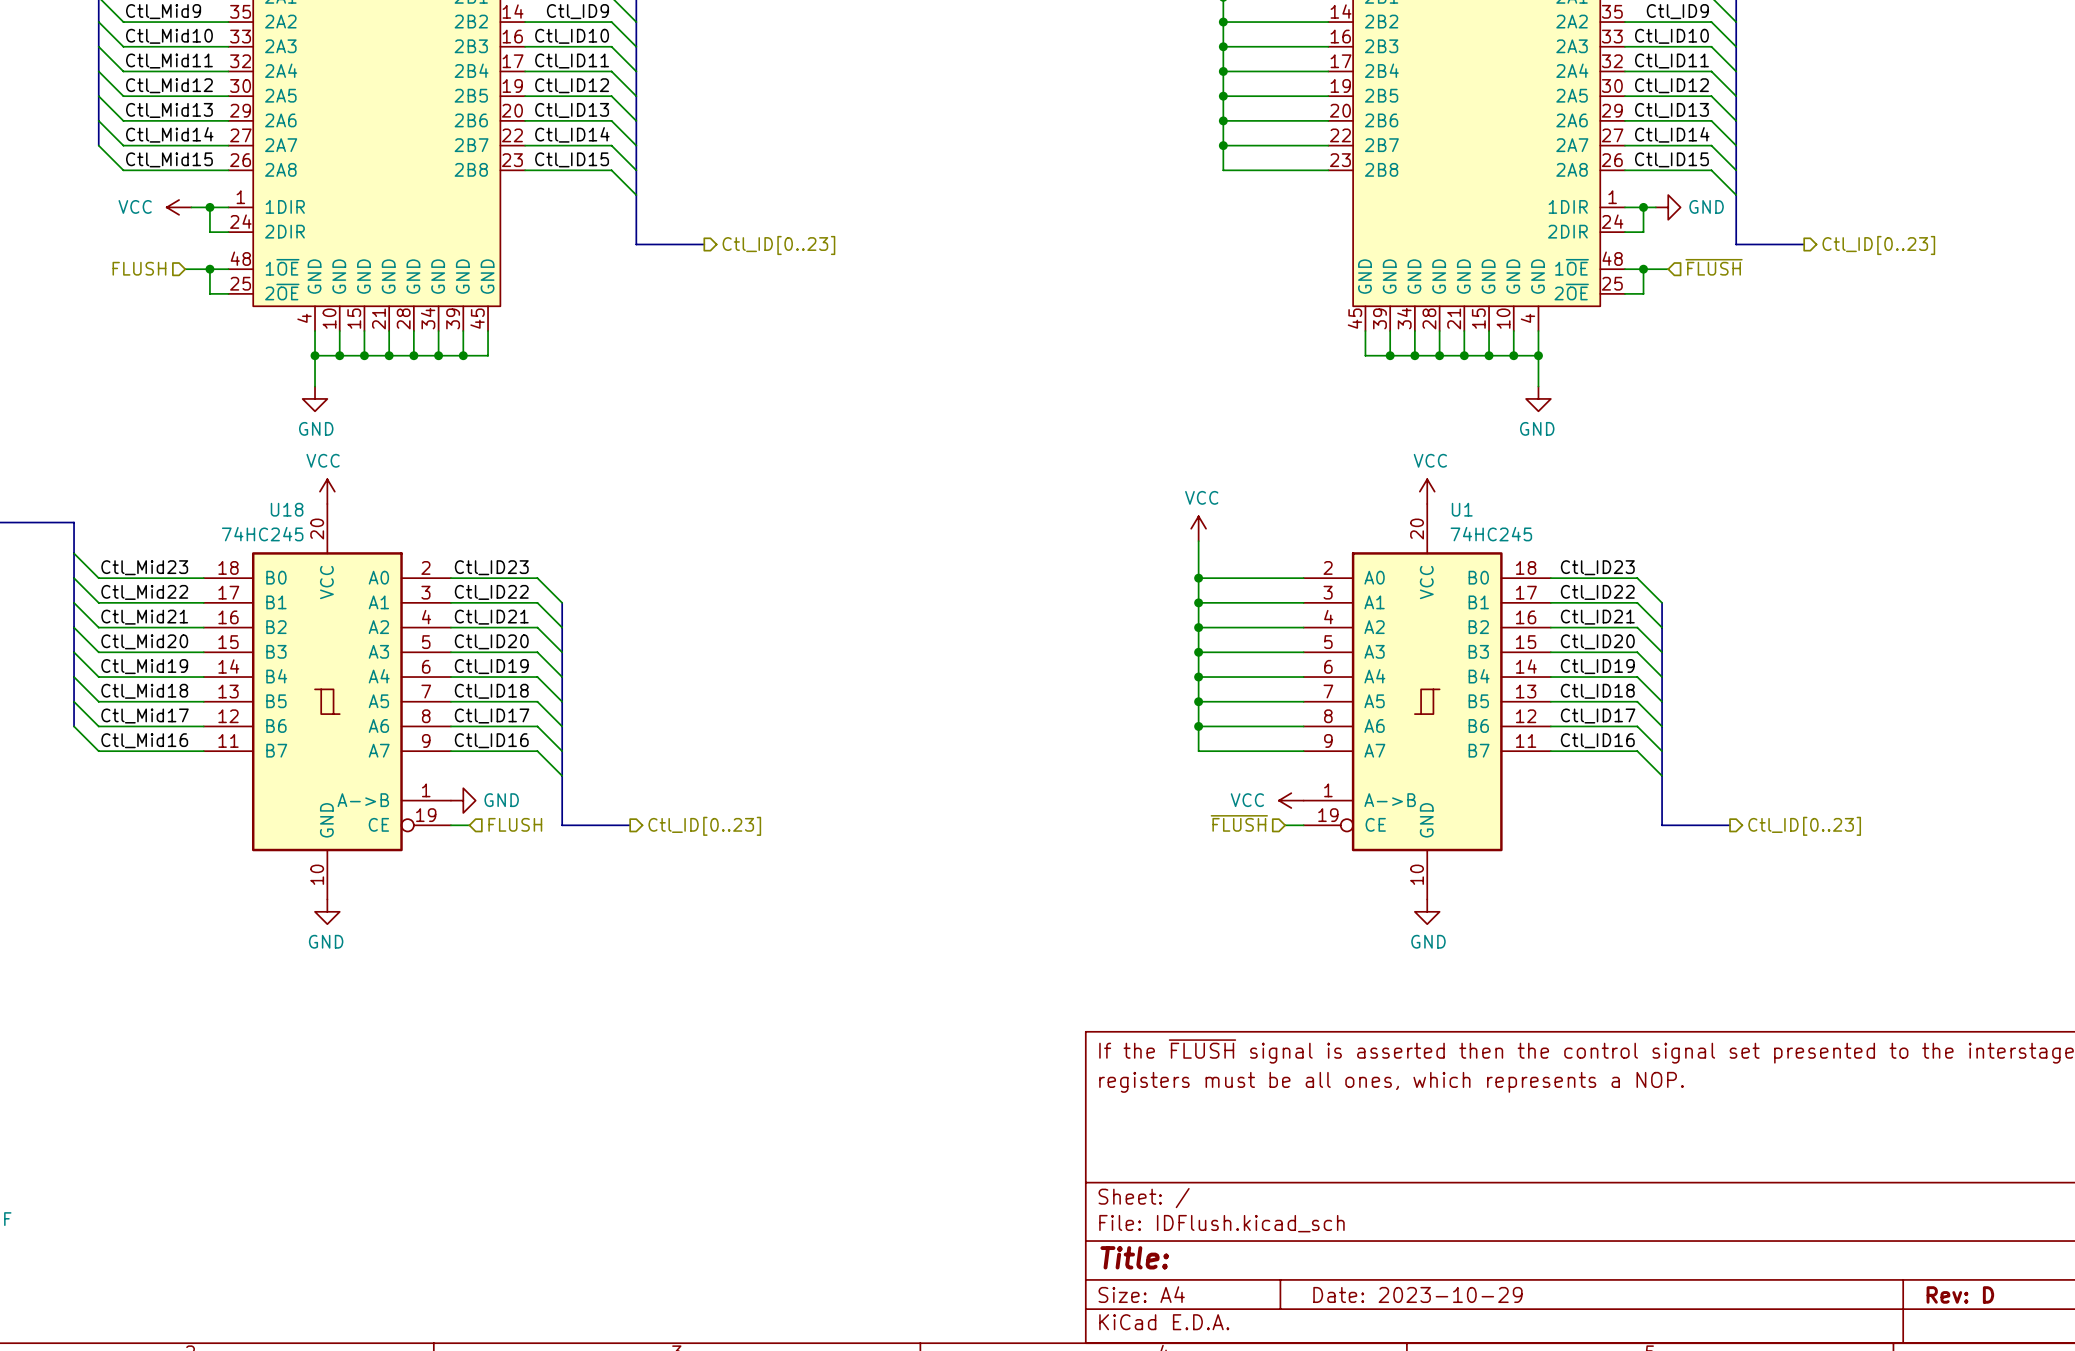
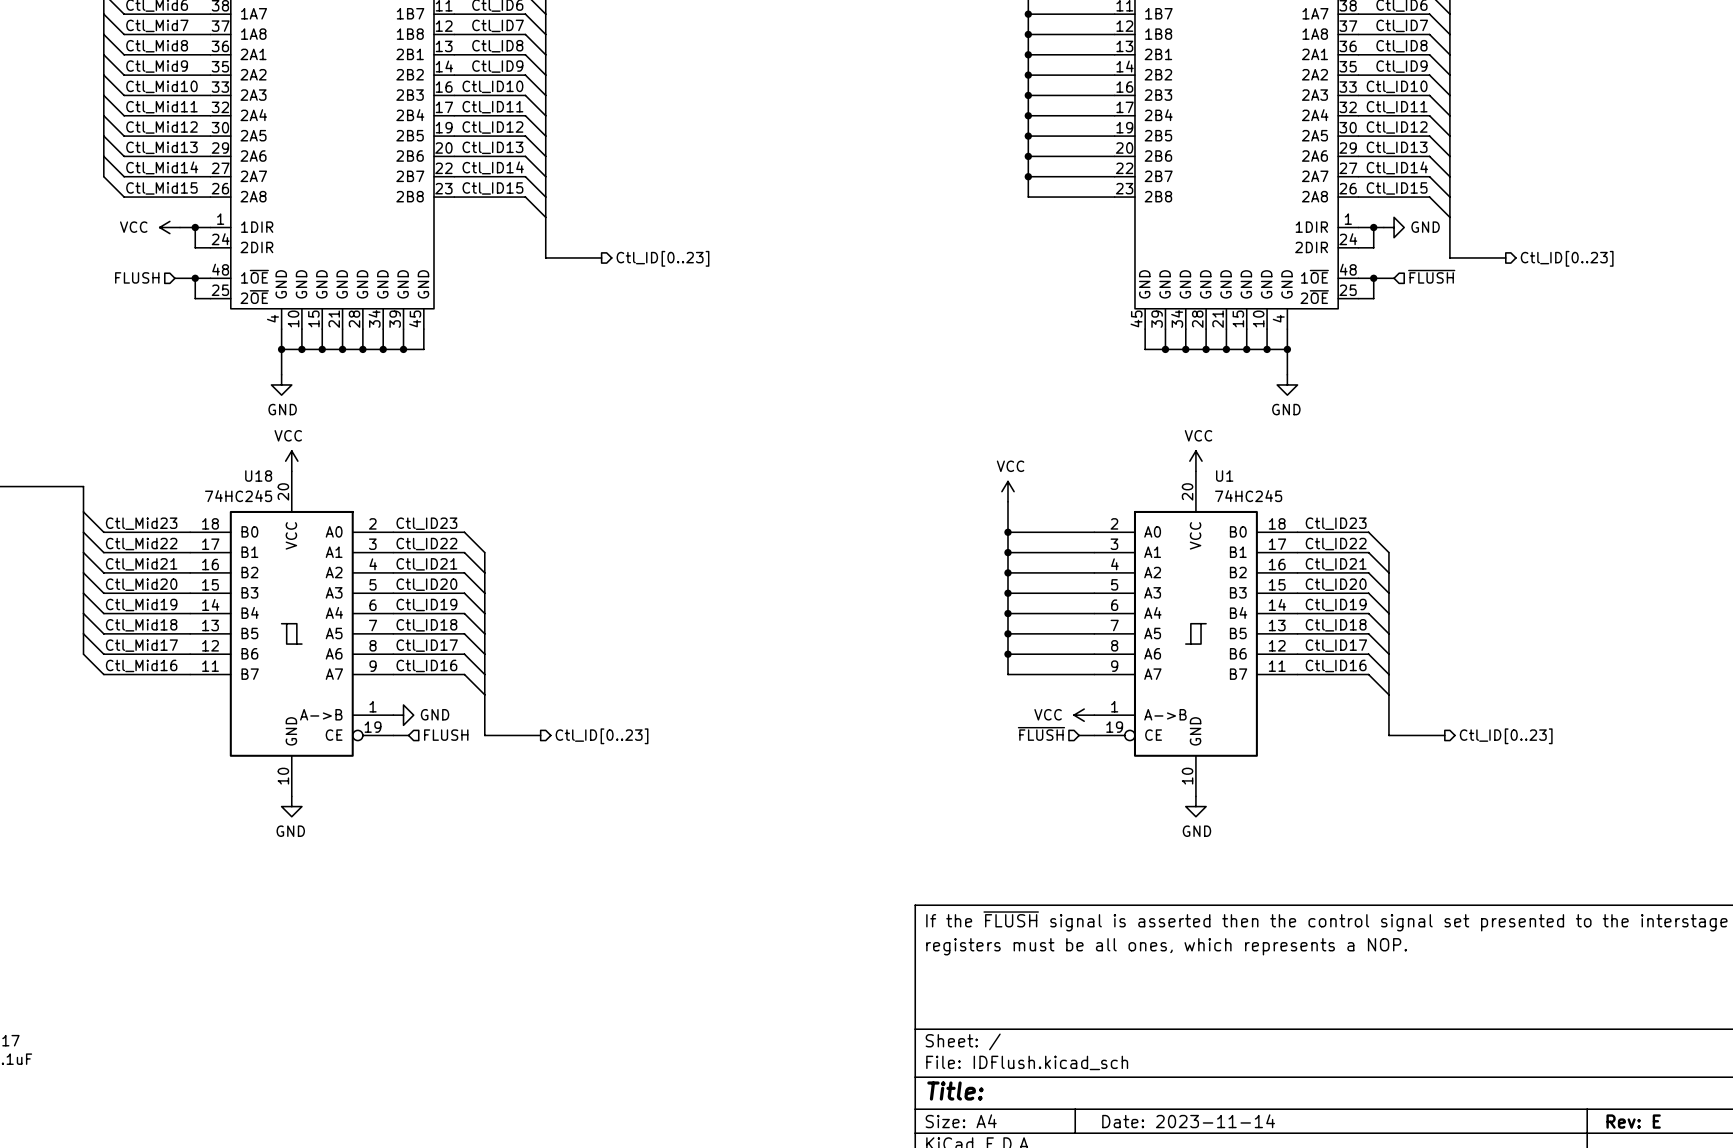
title block: Date: 2023-10-29 (1417, 1294) -> Date: 2023-11-14 (1188, 1121)
title block: Rev: D (1960, 1294) -> Rev: E (1633, 1121)

